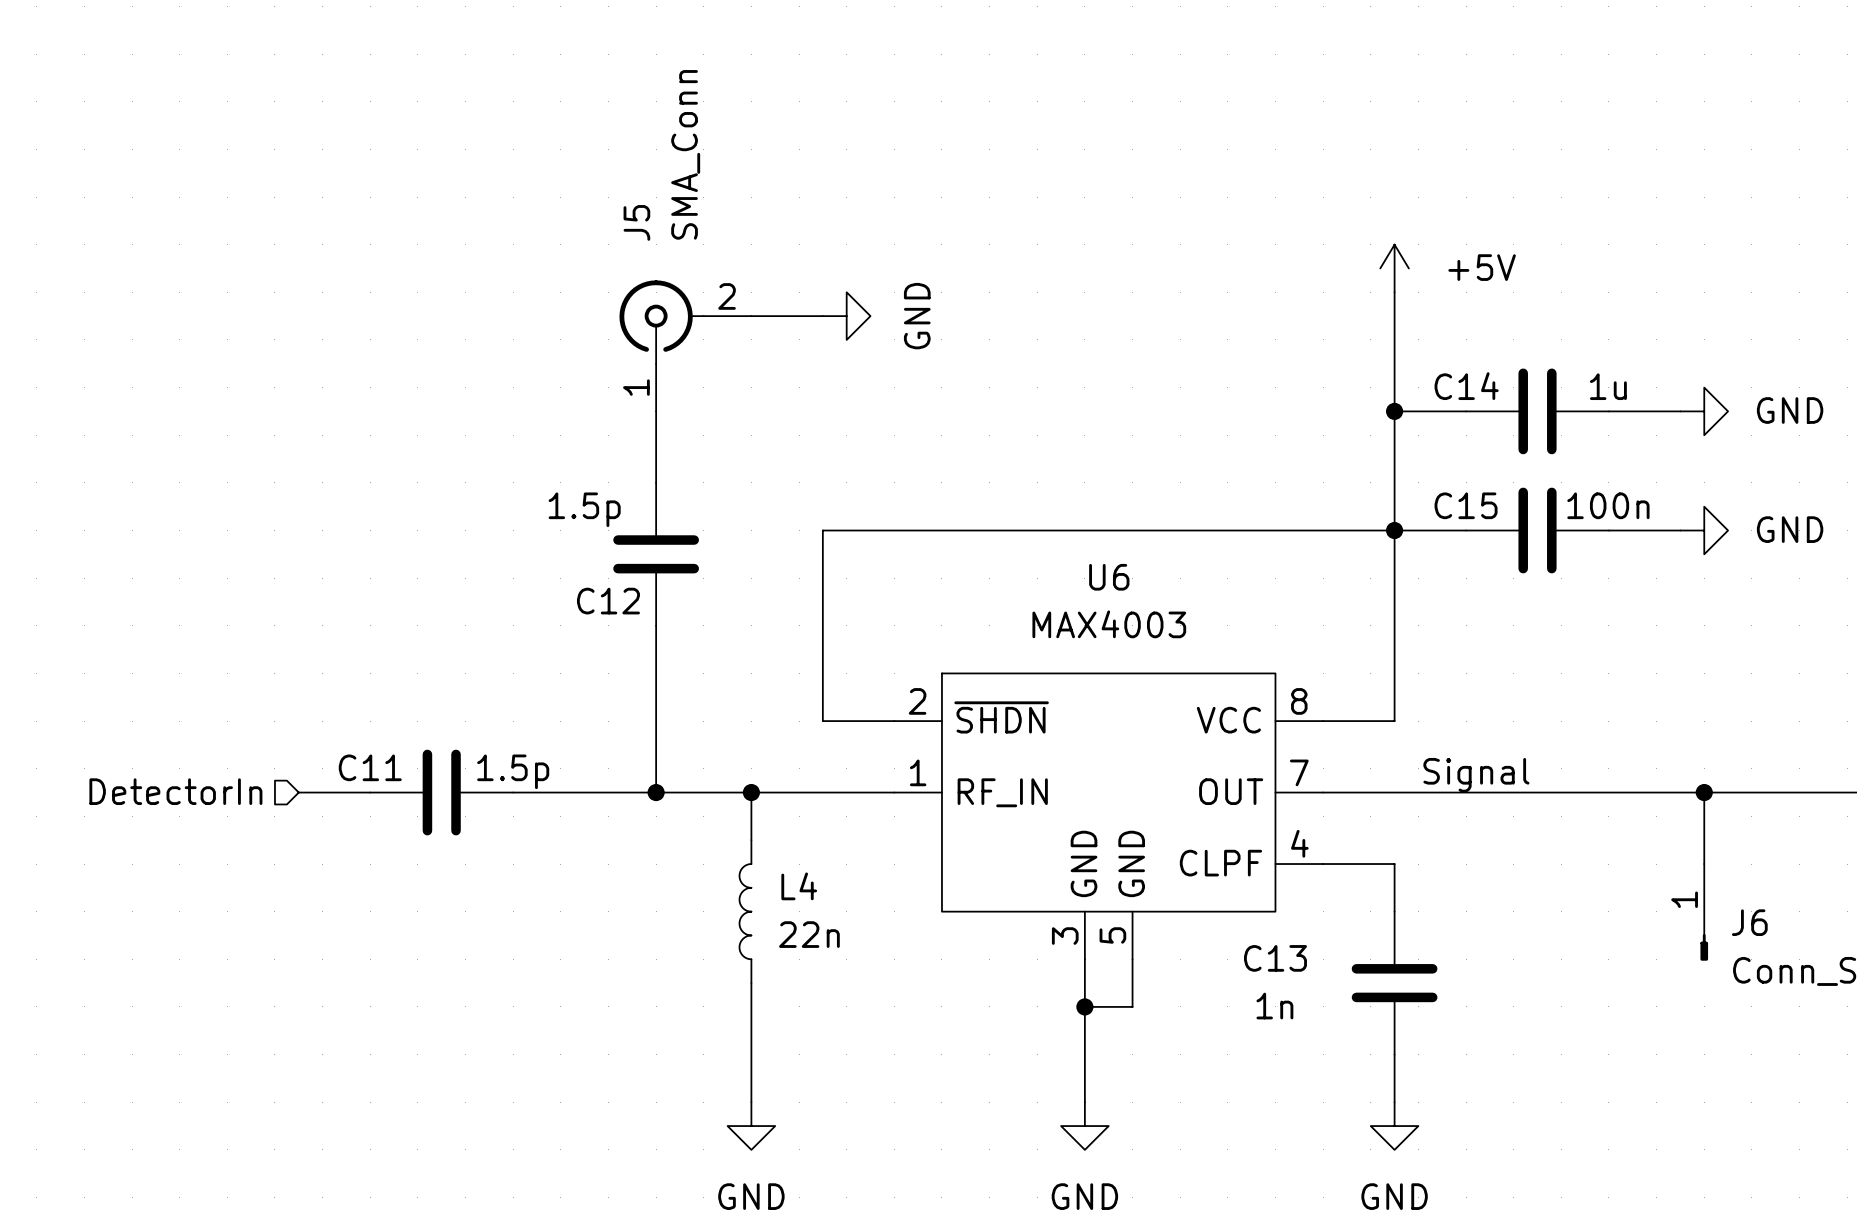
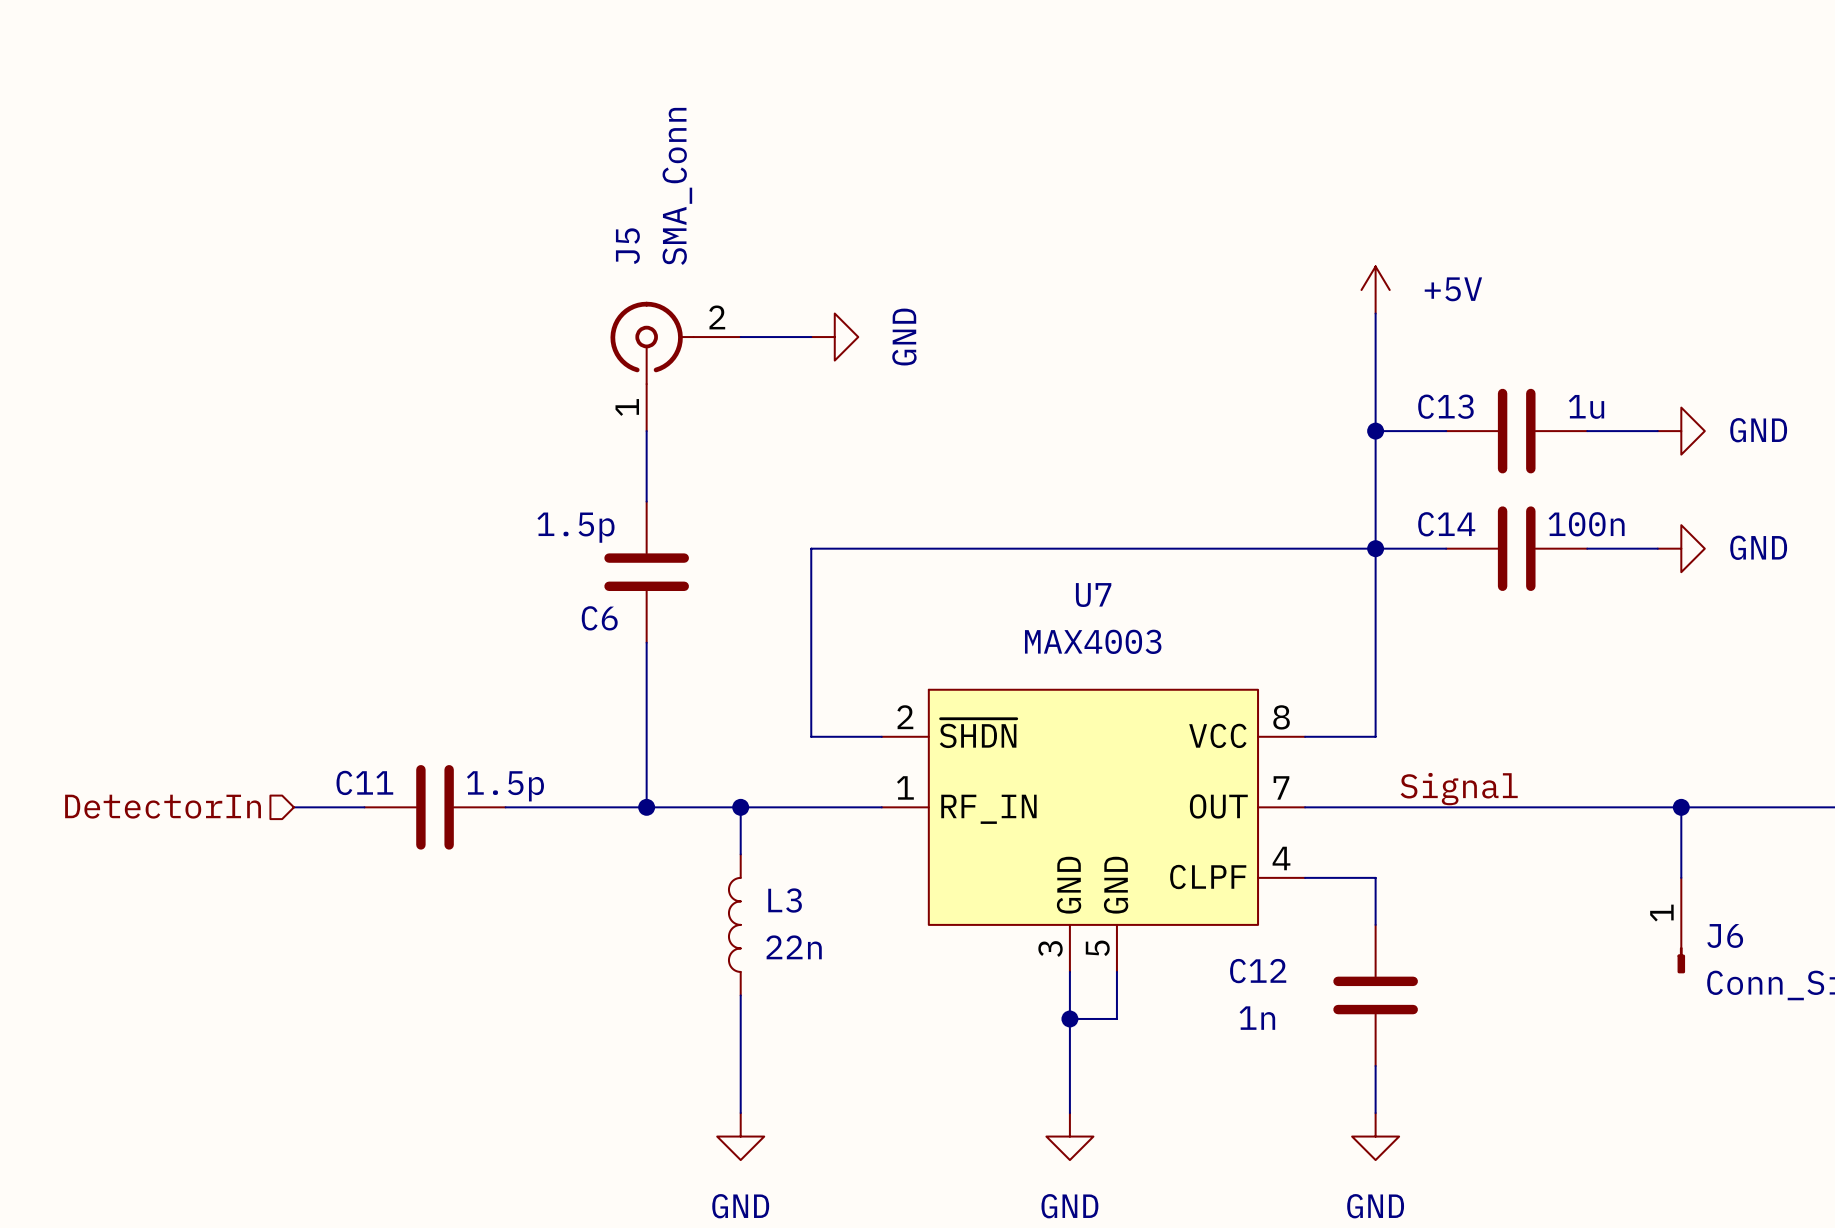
C14 name: C14 (1466, 386) -> C13 (1445, 406)
C15 name: C15 (1466, 505) -> C14 (1446, 524)
U6 name: U6 (1109, 577) -> U7 (1093, 595)
C12 name: C12 (608, 601) -> C6 (599, 618)
L4 name: L4 (799, 886) -> L3 (785, 900)
C13 name: C13 (1275, 958) -> C12 (1258, 971)

